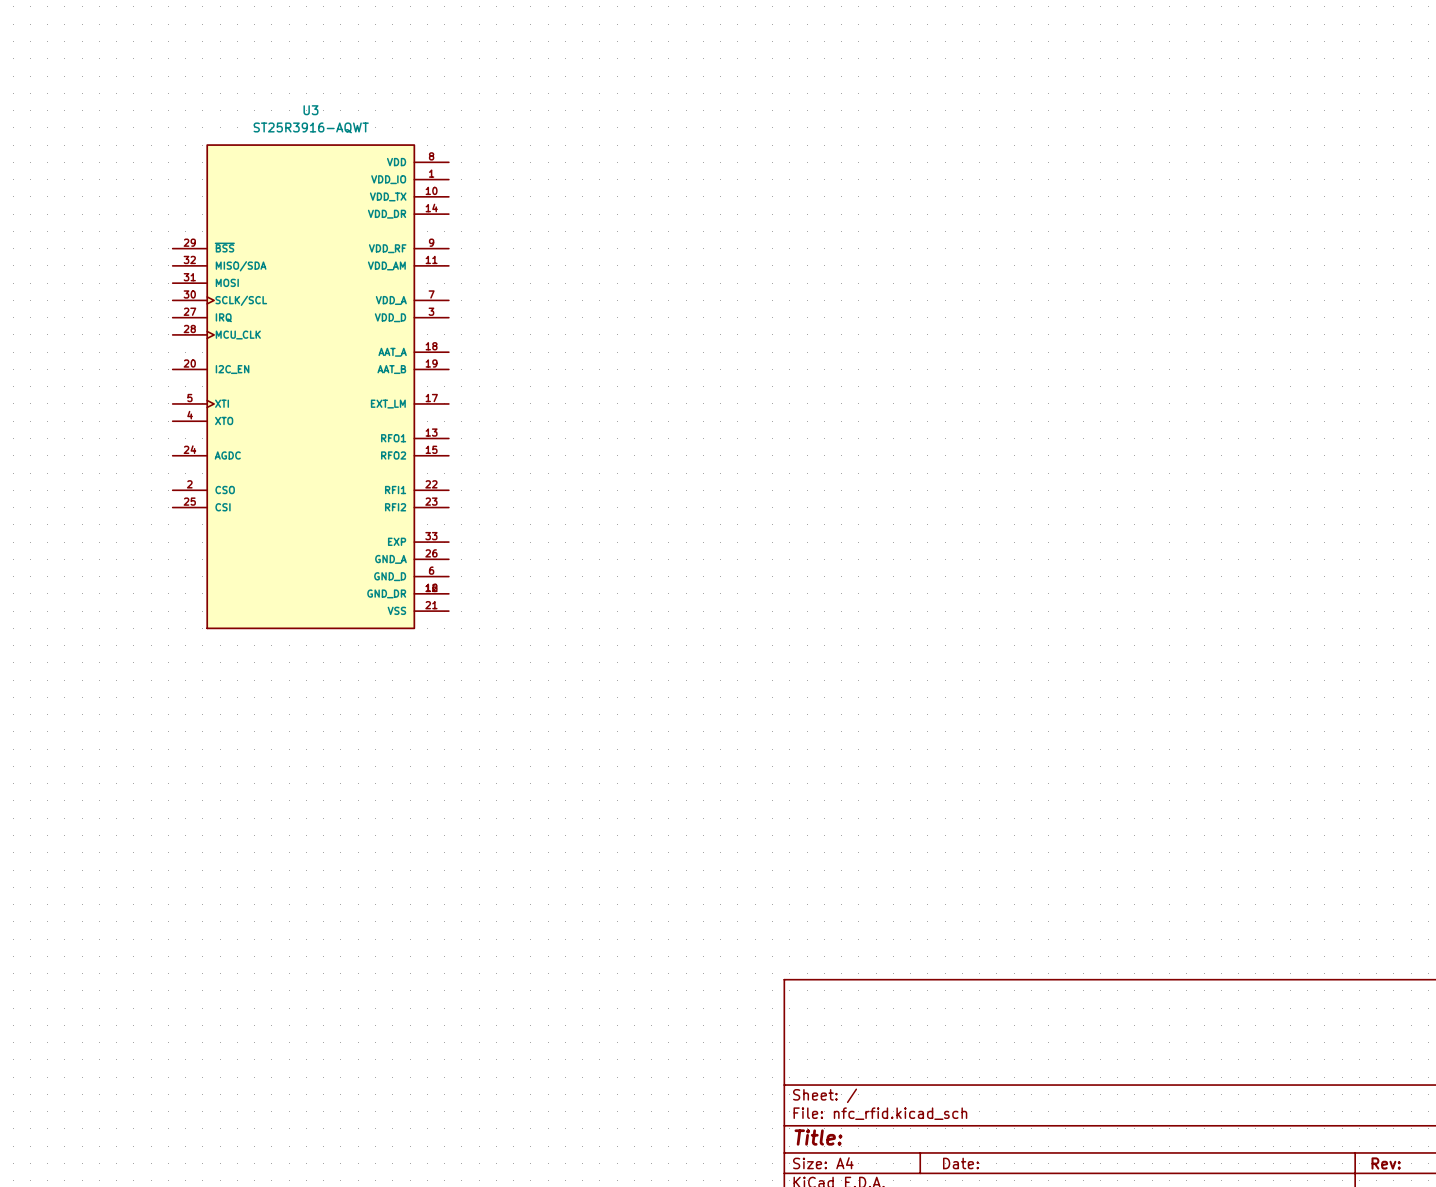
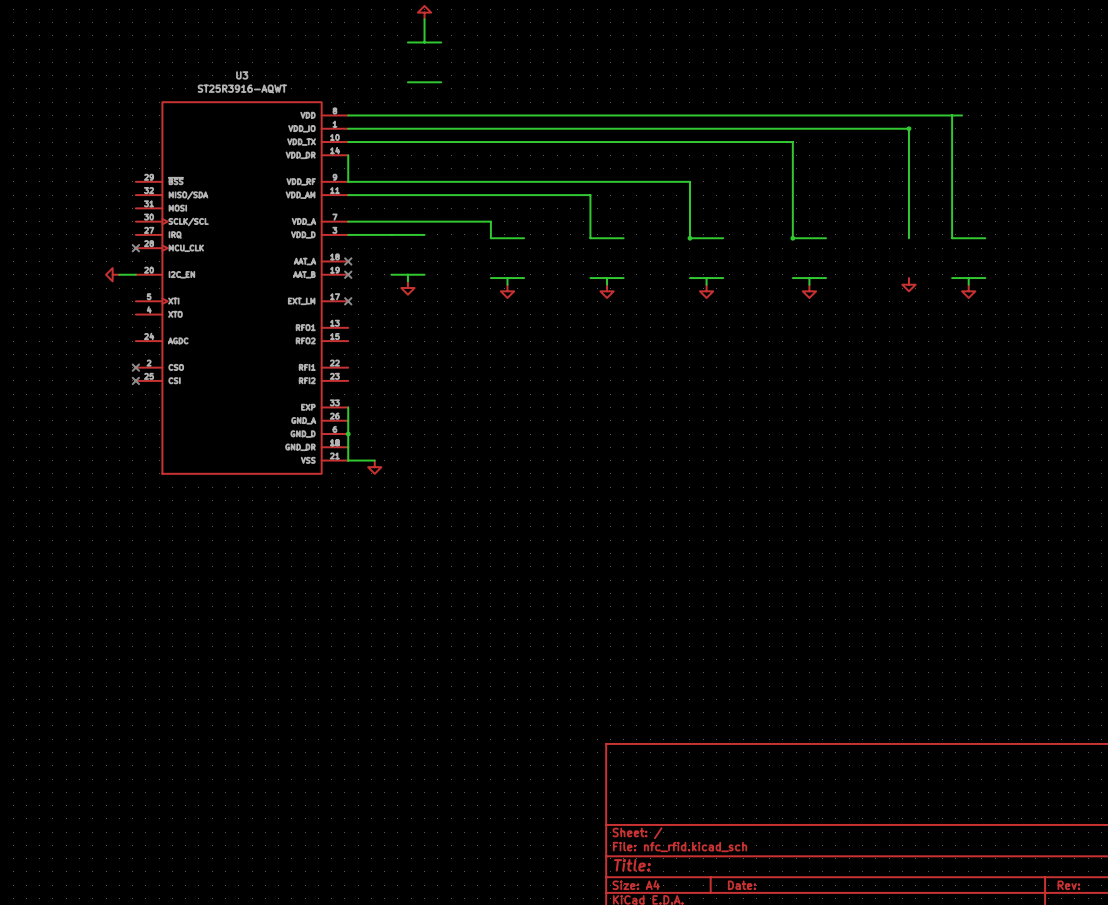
power symbol: none -> (424, 12)
wire: none -> (424, 19) (424, 42)
wire: none -> (407, 42) (441, 42)
wire: none -> (407, 82) (441, 82)
wire: none -> (348, 115) (962, 115)
wire: none -> (952, 115) (952, 238) (985, 238)
wire: none -> (348, 128) (908, 128) (908, 238)
junction: none -> (908, 128)
wire: none -> (348, 142) (792, 142) (792, 238) (826, 238)
wire: none -> (348, 155) (348, 181) (689, 181) (689, 238) (723, 238)
wire: none -> (348, 195) (590, 195) (590, 238) (623, 238)
wire: none -> (348, 221) (490, 221) (490, 238) (524, 238)
wire: none -> (348, 234) (424, 234)
junction: none -> (689, 238)
junction: none -> (792, 238)
no-connect mark: none -> (135, 248)
no-connect mark: none -> (348, 261)
power symbol: none -> (112, 274)
wire: none -> (119, 274) (135, 274)
no-connect mark: none -> (348, 274)
wire: none -> (391, 274) (424, 274)
wire: none -> (407, 274) (407, 281)
wire: none -> (490, 278) (524, 278)
wire: none -> (507, 278) (507, 284)
wire: none -> (590, 278) (623, 278)
wire: none -> (607, 278) (607, 284)
wire: none -> (689, 278) (723, 278)
wire: none -> (706, 278) (706, 284)
wire: none -> (792, 278) (826, 278)
wire: none -> (809, 278) (809, 284)
wire: none -> (952, 278) (985, 278)
wire: none -> (968, 278) (968, 284)
power symbol: none -> (908, 284)
power symbol: none -> (407, 288)
power symbol: none -> (507, 291)
power symbol: none -> (607, 291)
power symbol: none -> (706, 291)
power symbol: none -> (809, 291)
power symbol: none -> (968, 291)
no-connect mark: none -> (348, 301)
no-connect mark: none -> (135, 367)
no-connect mark: none -> (135, 380)
wire: none -> (348, 407) (348, 460) (374, 460)
junction: none -> (348, 434)
power symbol: none -> (374, 467)

